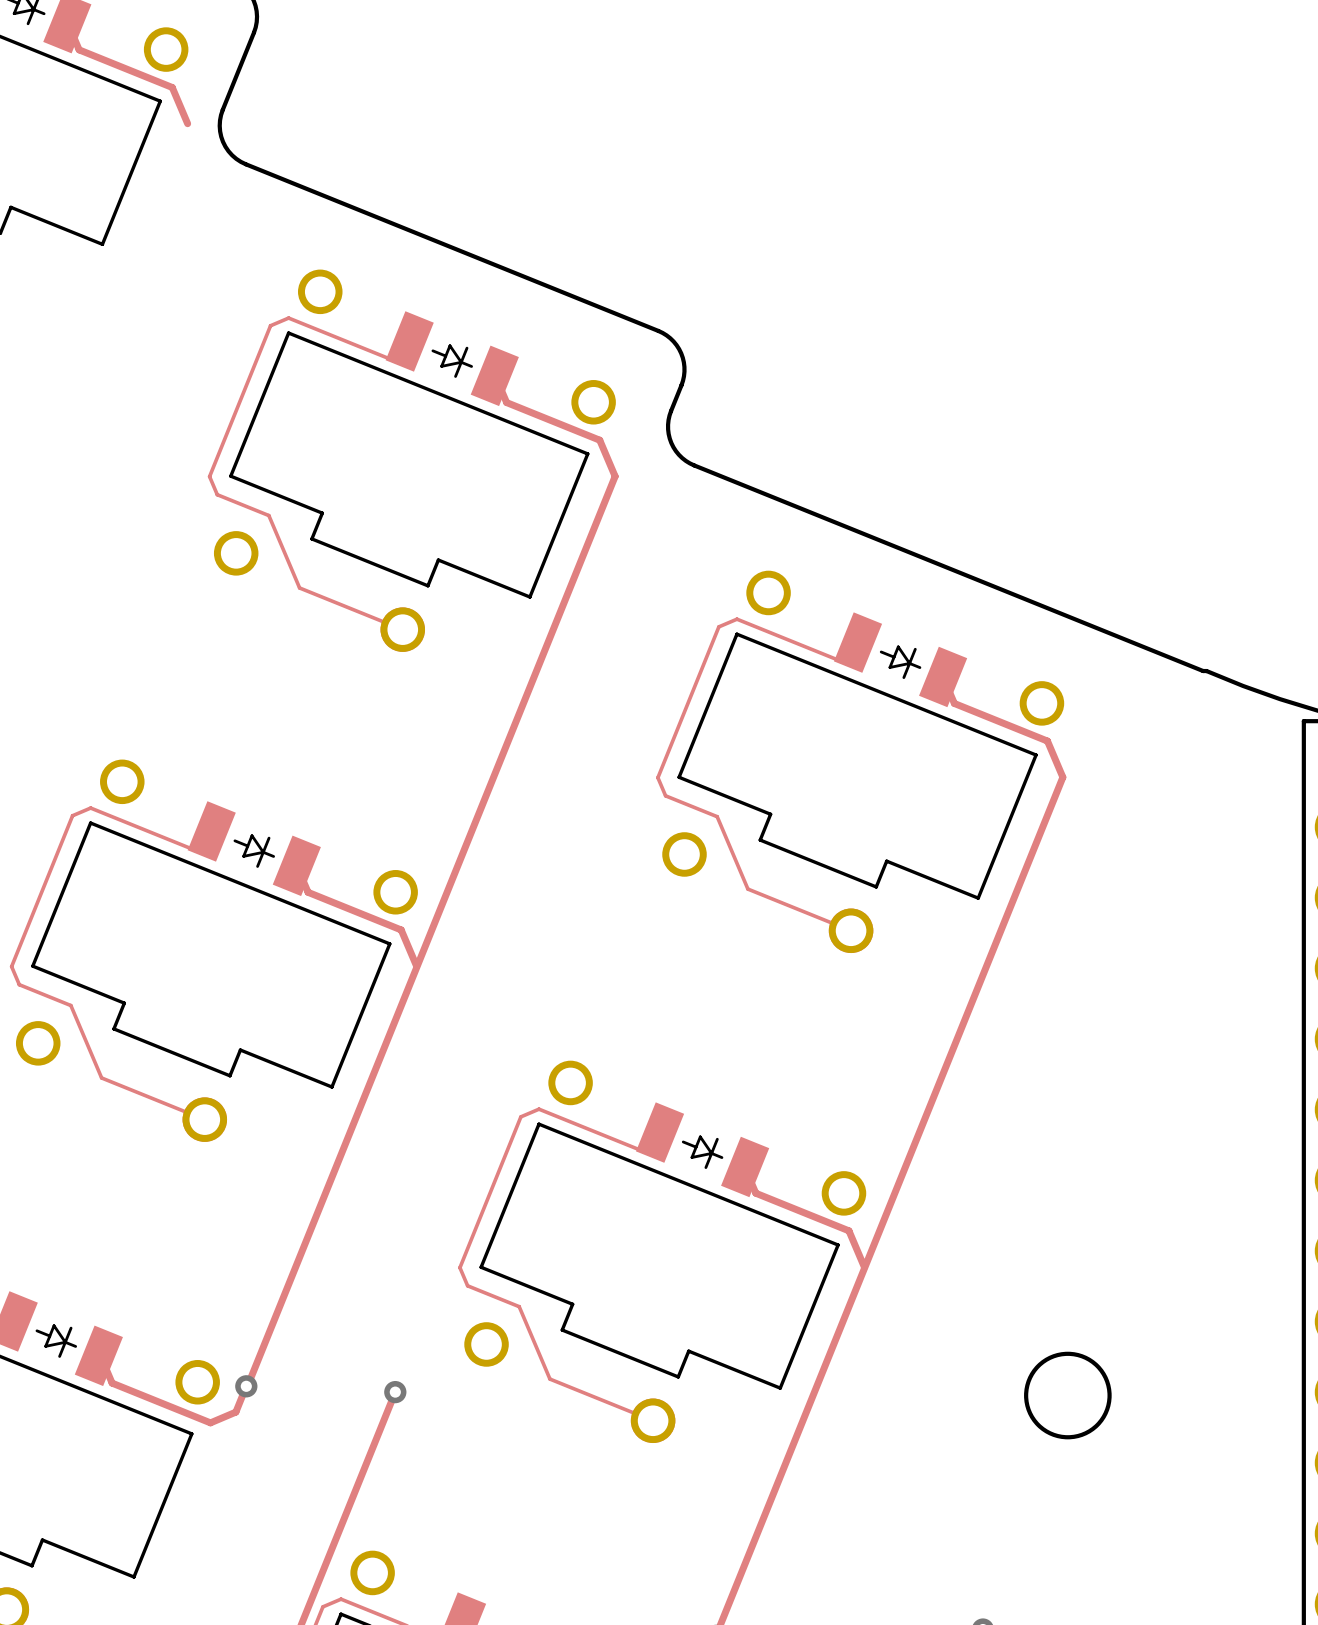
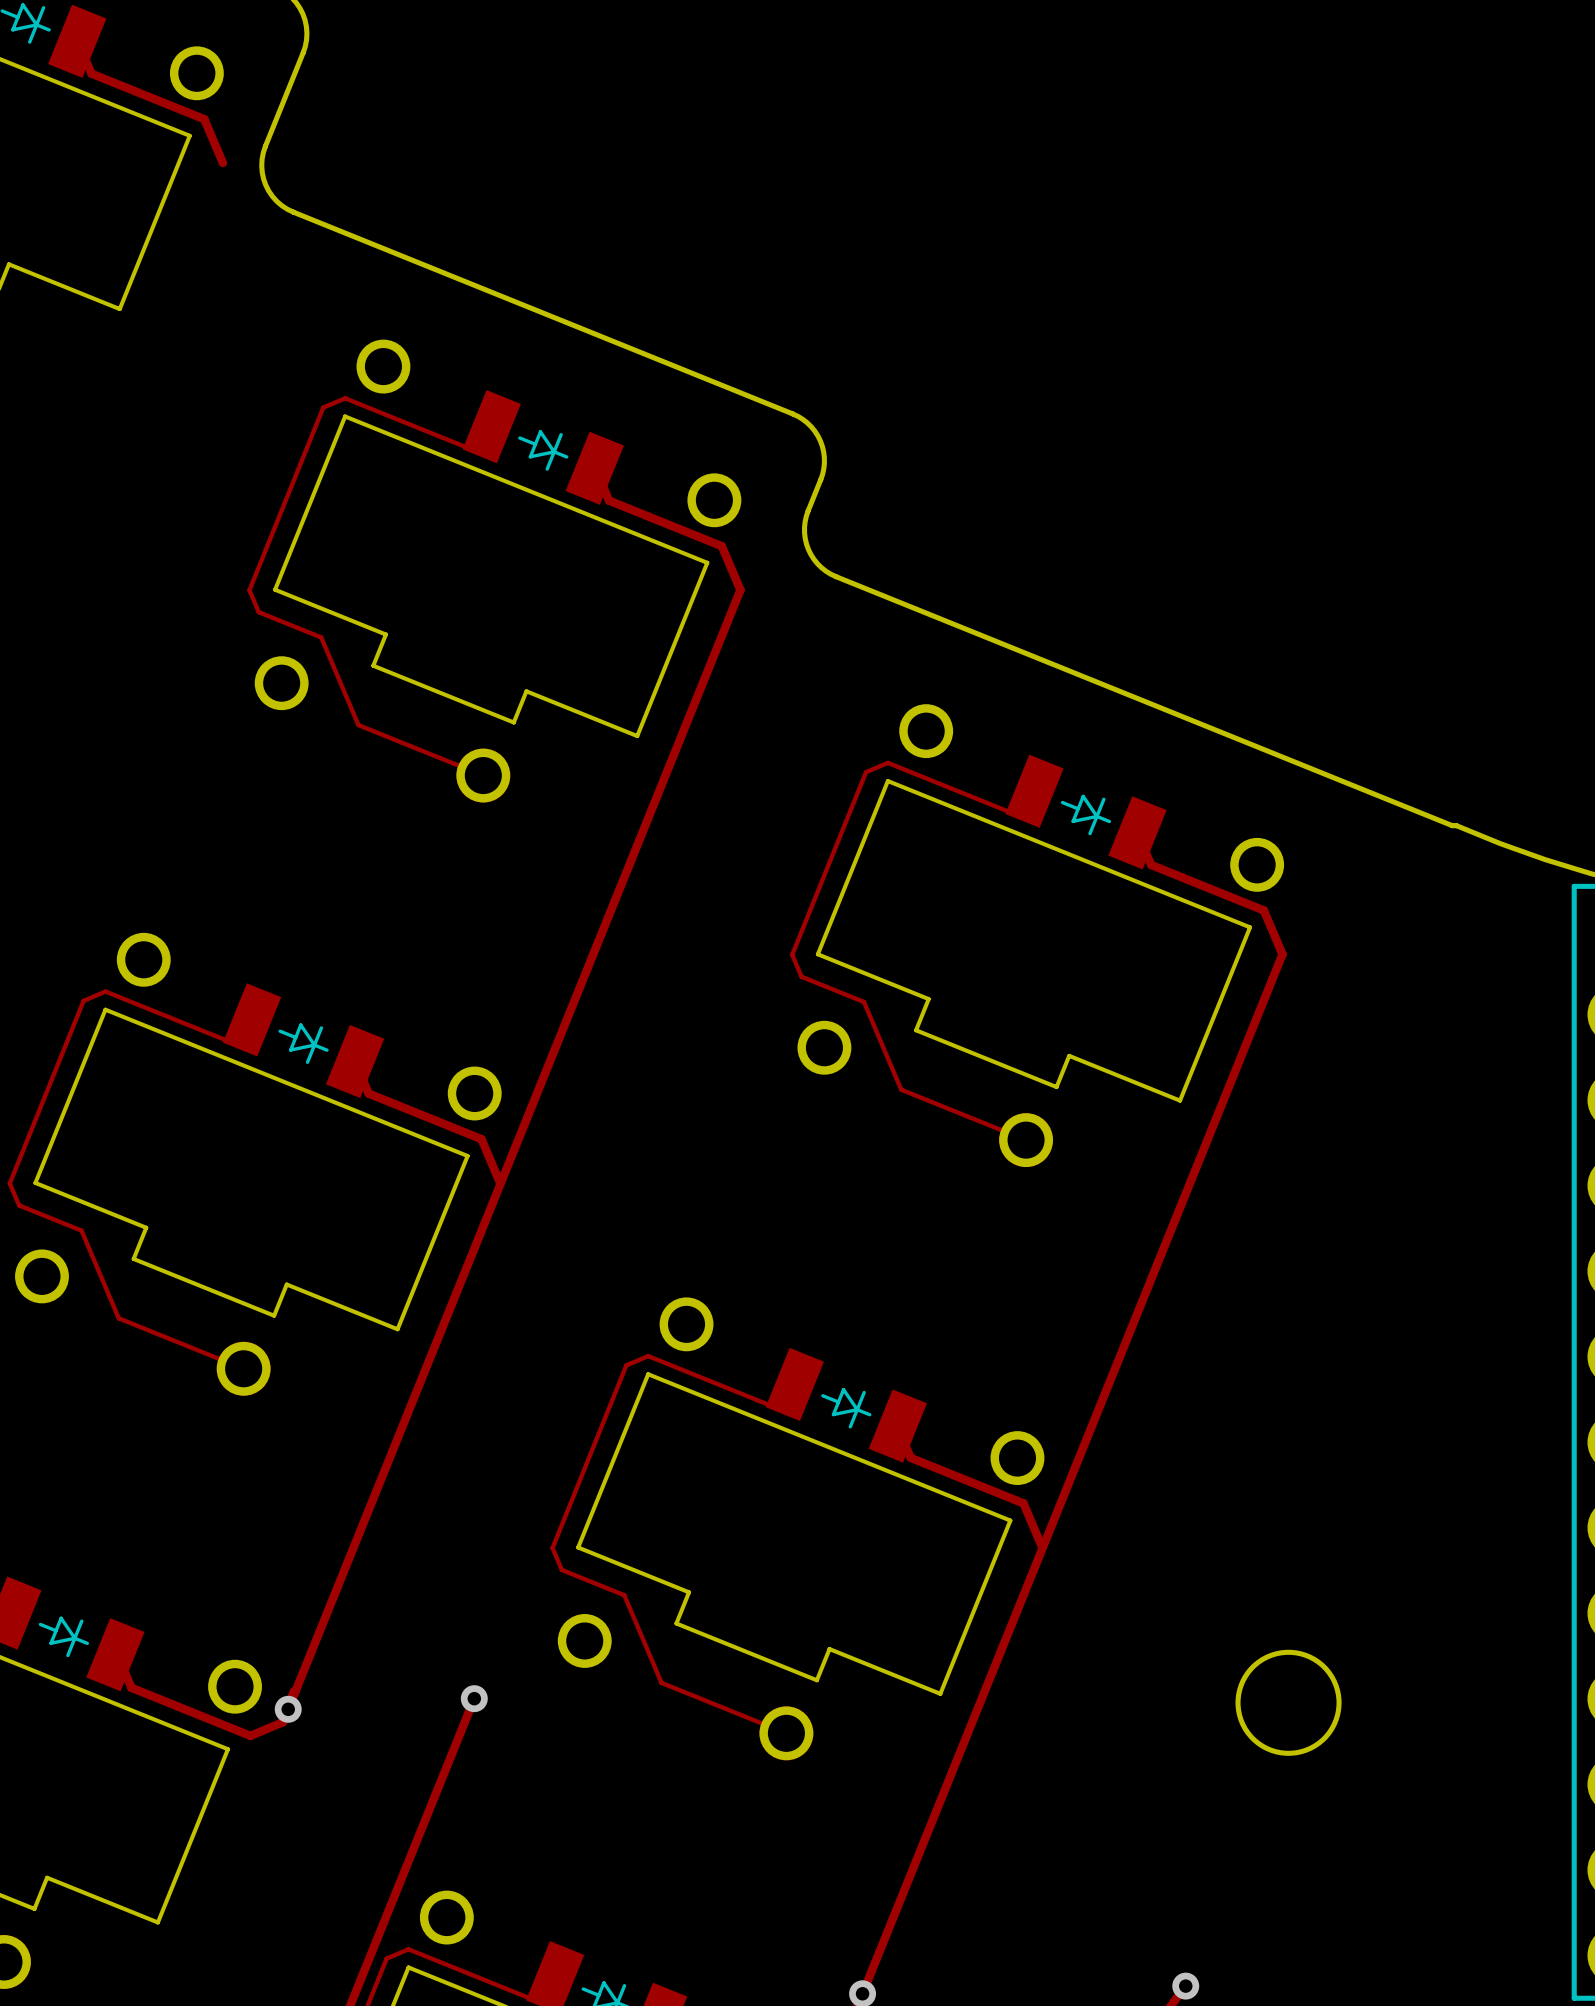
via position: (246, 1386) -> (288, 1709)

